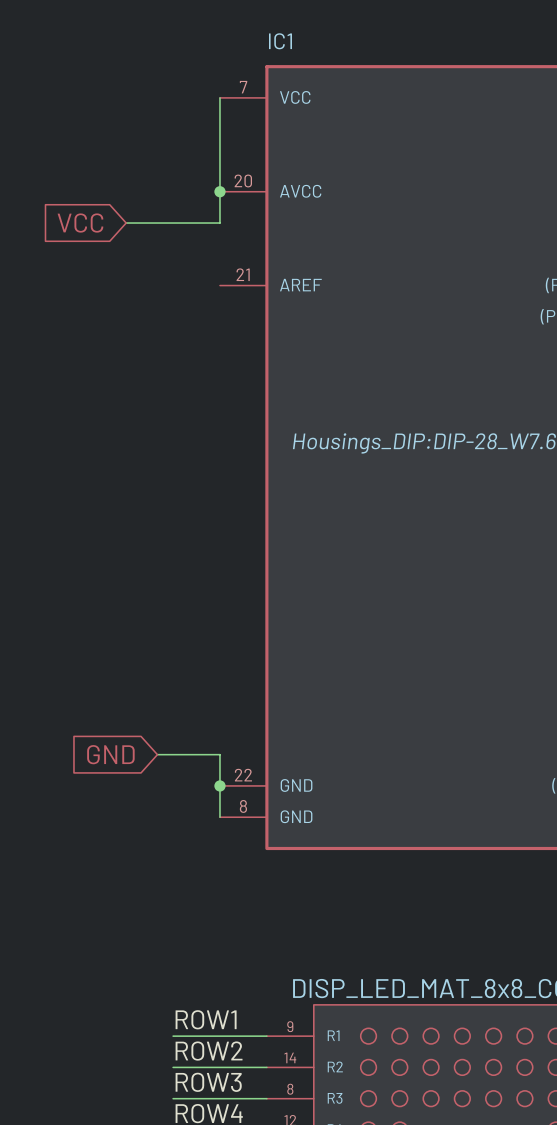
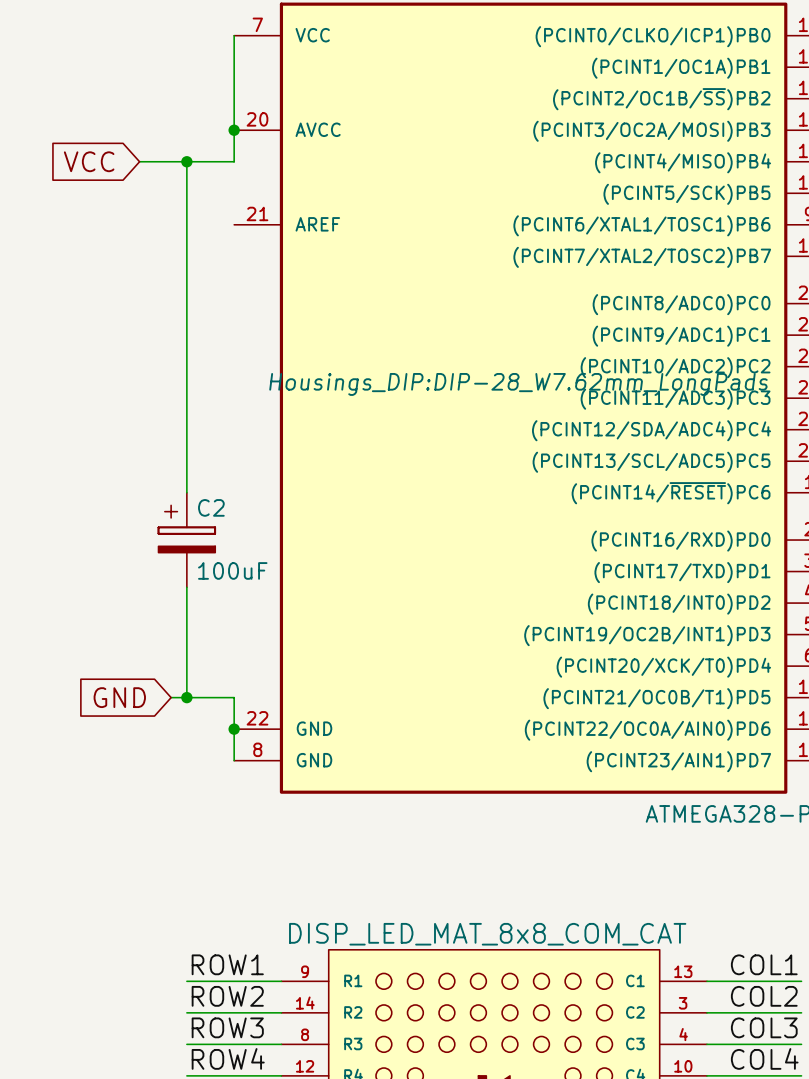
wire: none -> (186, 161) (186, 492)
junction: none -> (186, 161)
C2: none -> 100uF (186, 540)
wire: none -> (186, 587) (186, 697)
junction: none -> (186, 697)

